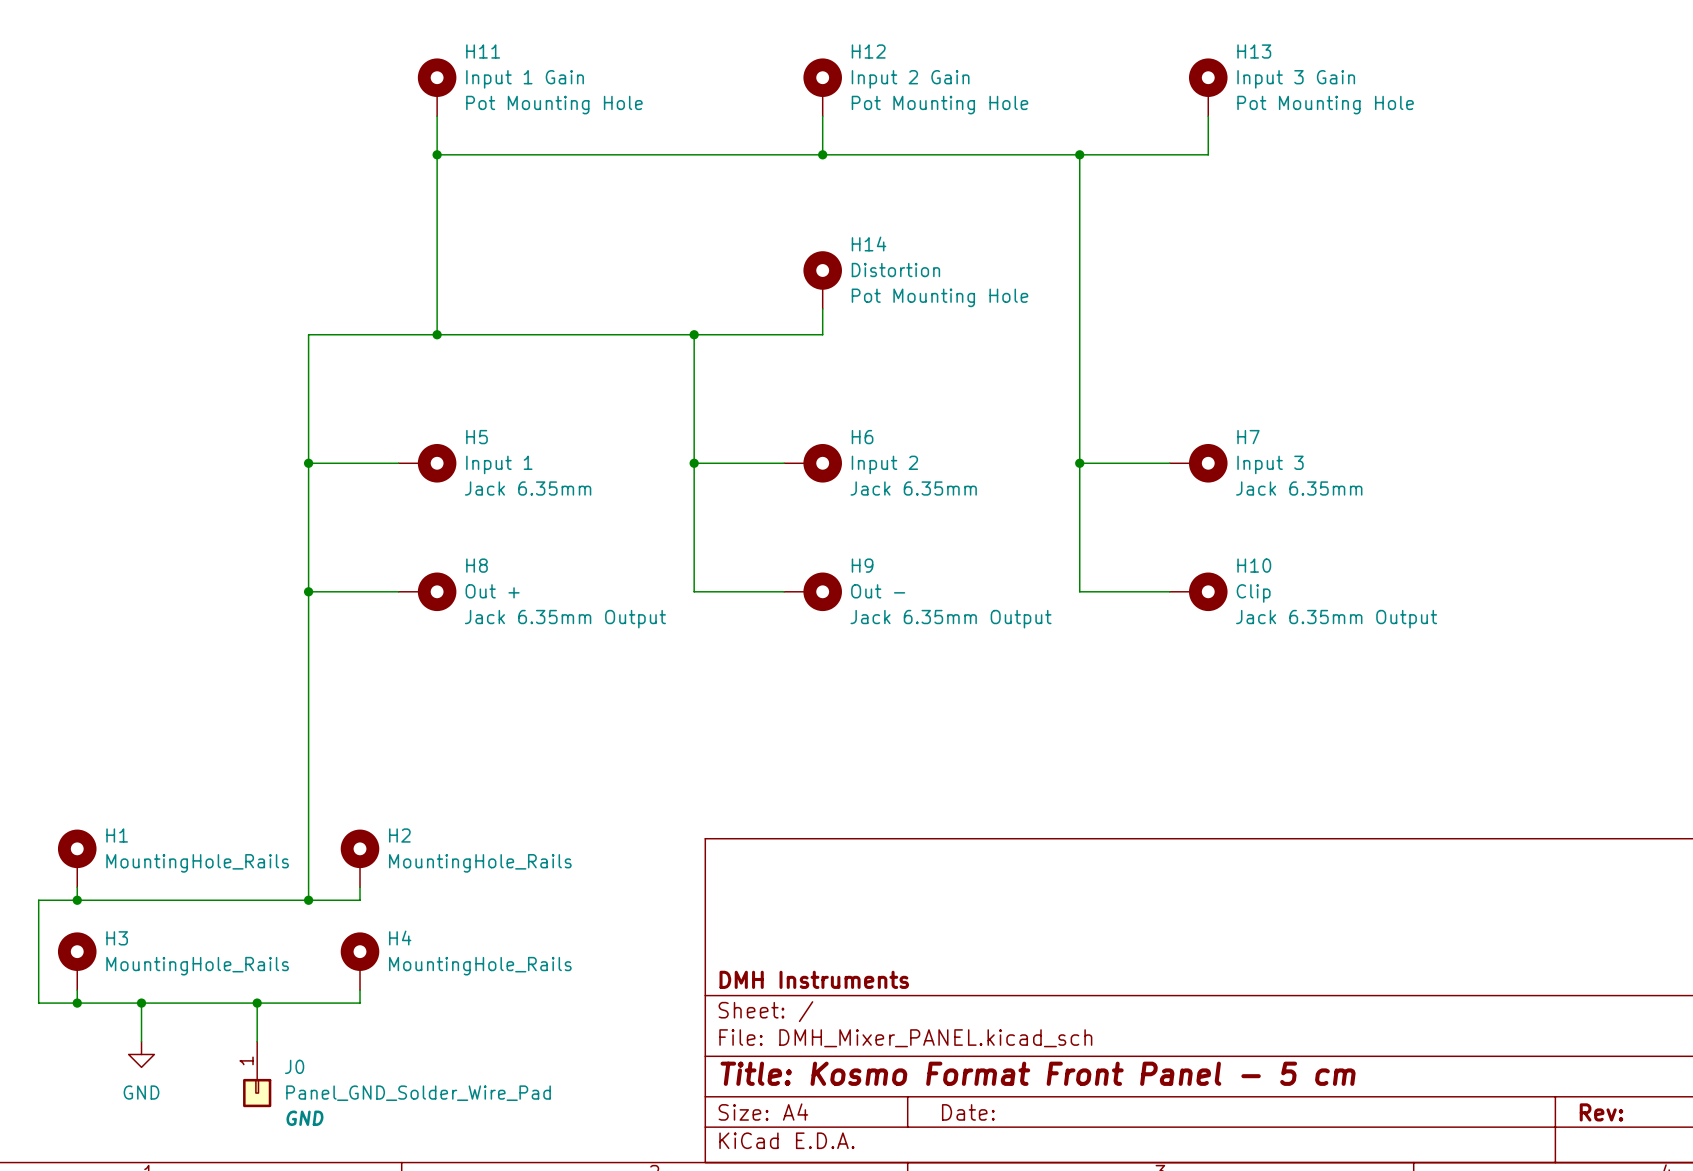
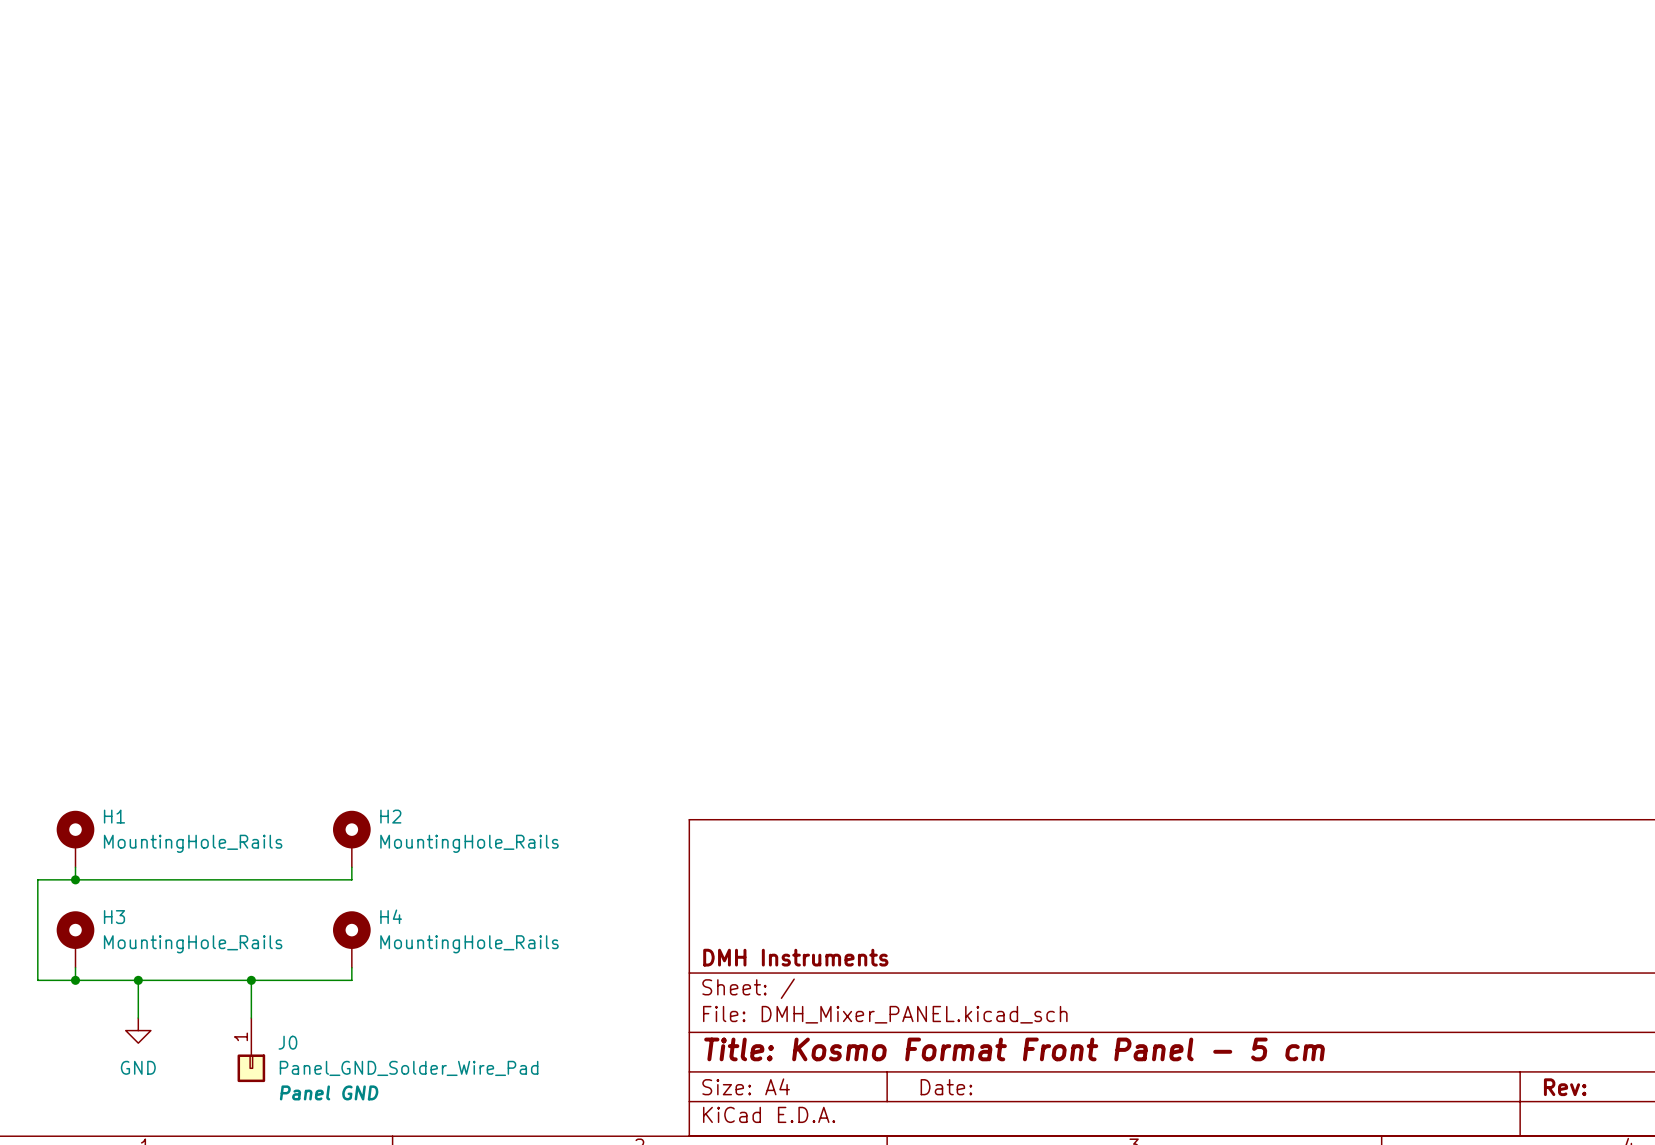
H11: Input 1 Gain (437, 87) -> none
H12: Input 2 Gain (822, 87) -> none
H13: Input 3 Gain (1208, 87) -> none
wire: (437, 116) (437, 334) -> none
wire: (822, 116) (822, 154) -> none
wire: (1208, 116) (1208, 154) (437, 154) -> none
junction: (437, 154) -> none
junction: (822, 154) -> none
wire: (1079, 154) (1079, 591) (1169, 591) -> none
junction: (1079, 154) -> none
H14: Distortion (822, 280) -> none
wire: (822, 309) (822, 334) (308, 334) (308, 900) -> none
junction: (437, 334) -> none
wire: (694, 334) (694, 591) (784, 591) -> none
junction: (694, 334) -> none
wire: (308, 463) (398, 463) -> none
junction: (308, 463) -> none
H5: Input 1 (427, 463) -> none
wire: (694, 463) (784, 463) -> none
junction: (694, 463) -> none
H6: Input 2 (813, 463) -> none
wire: (1079, 463) (1169, 463) -> none
junction: (1079, 463) -> none
H7: Input 3 (1198, 463) -> none
wire: (308, 591) (398, 591) -> none
junction: (308, 591) -> none
H8: Out + (427, 591) -> none
H9: Out - (813, 591) -> none
H10: Clip (1198, 591) -> none
junction: (308, 900) -> none
J0 text: GND (304, 1118) -> Panel GND (329, 1092)

